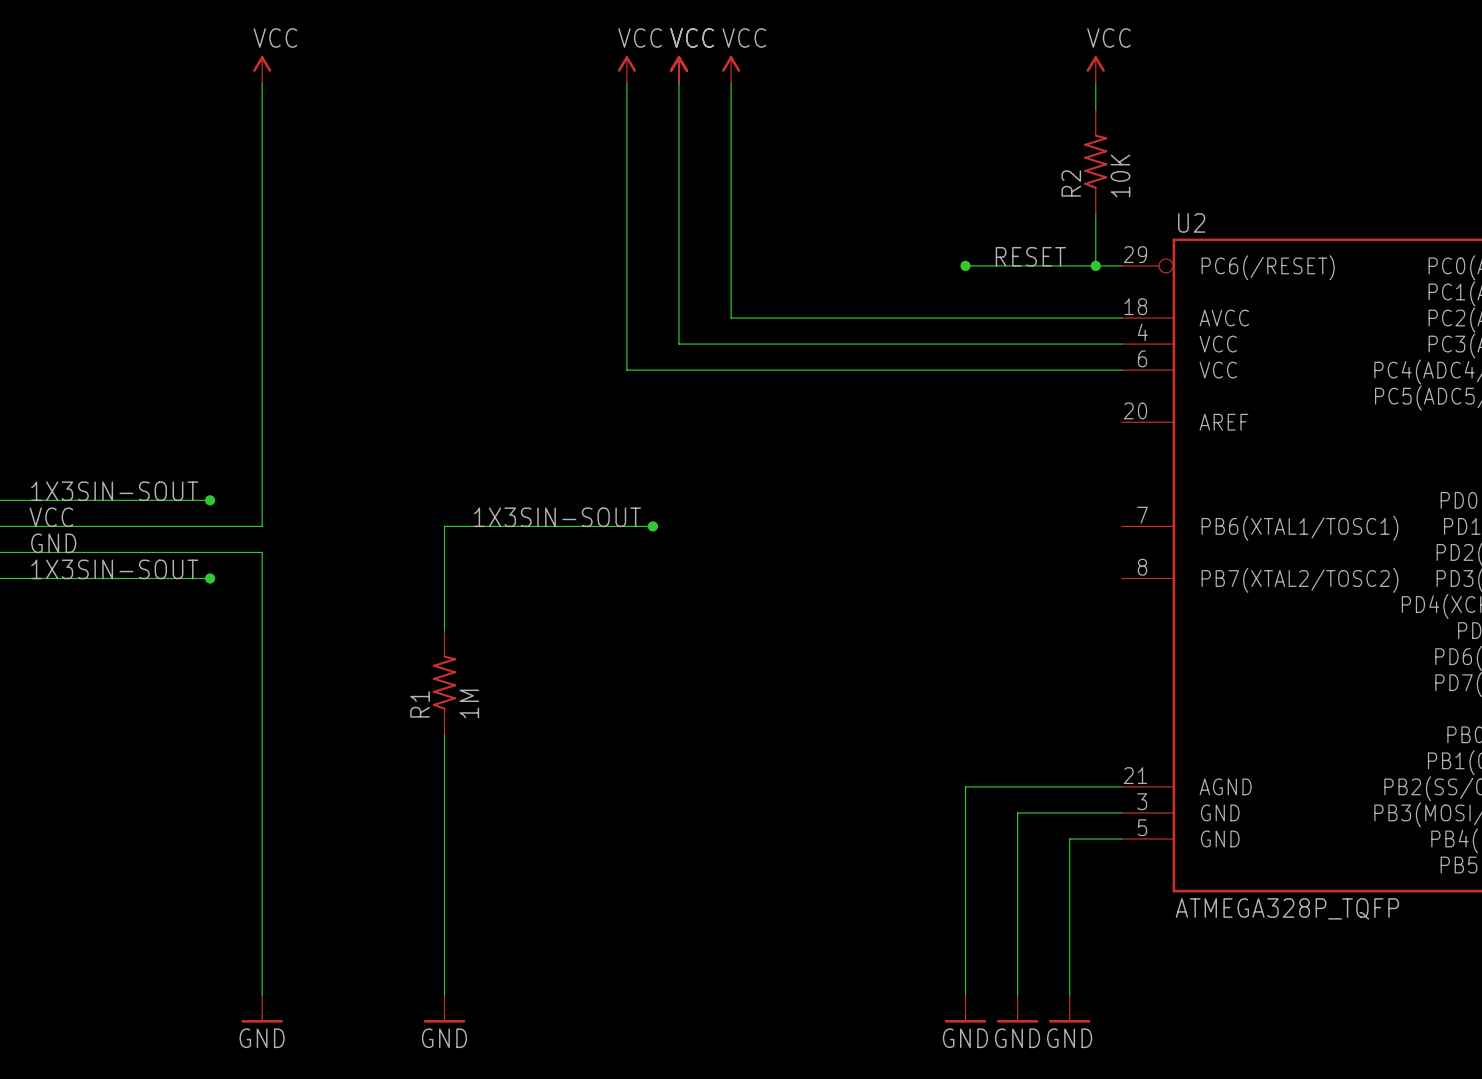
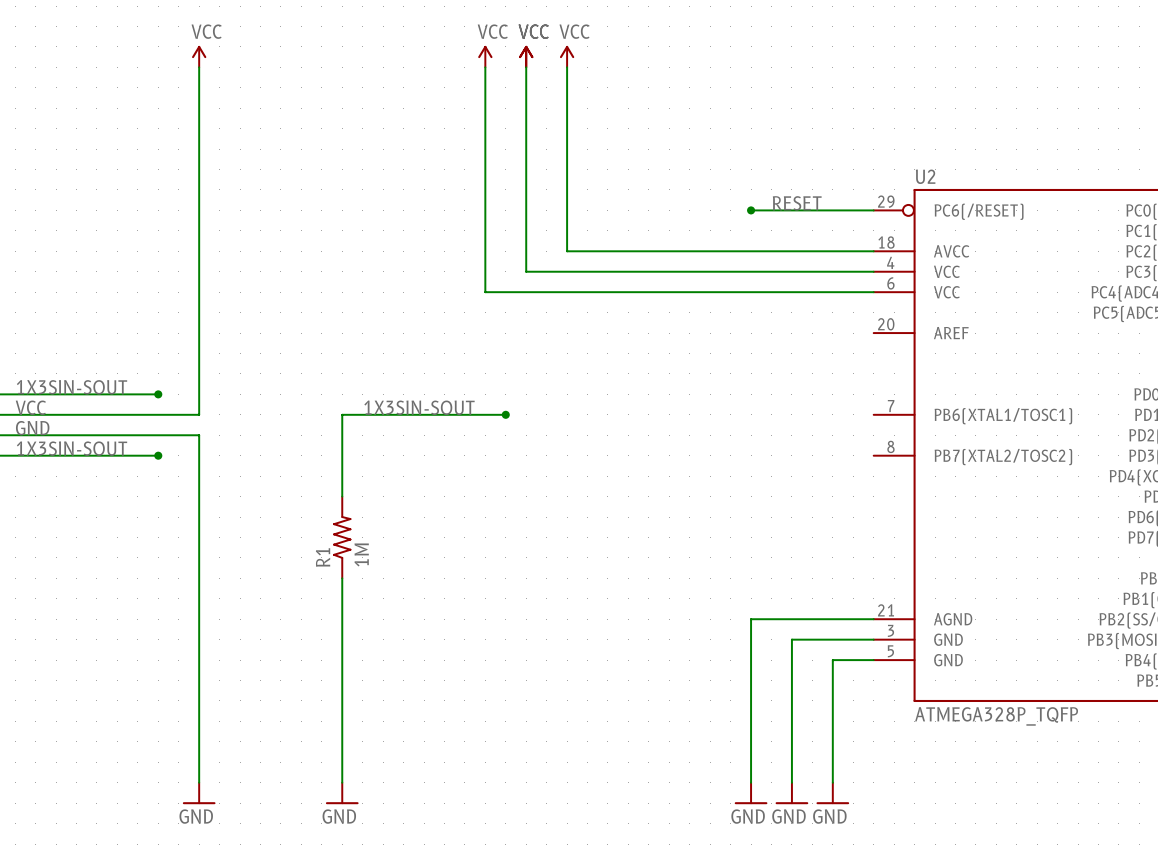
power symbol: VCC (1095, 69) -> none
wire: (1095, 83) (1095, 109) -> none
R2: 10K (1095, 161) -> none
wire: (1095, 213) (1095, 265) -> none
junction: (1095, 265) -> none

